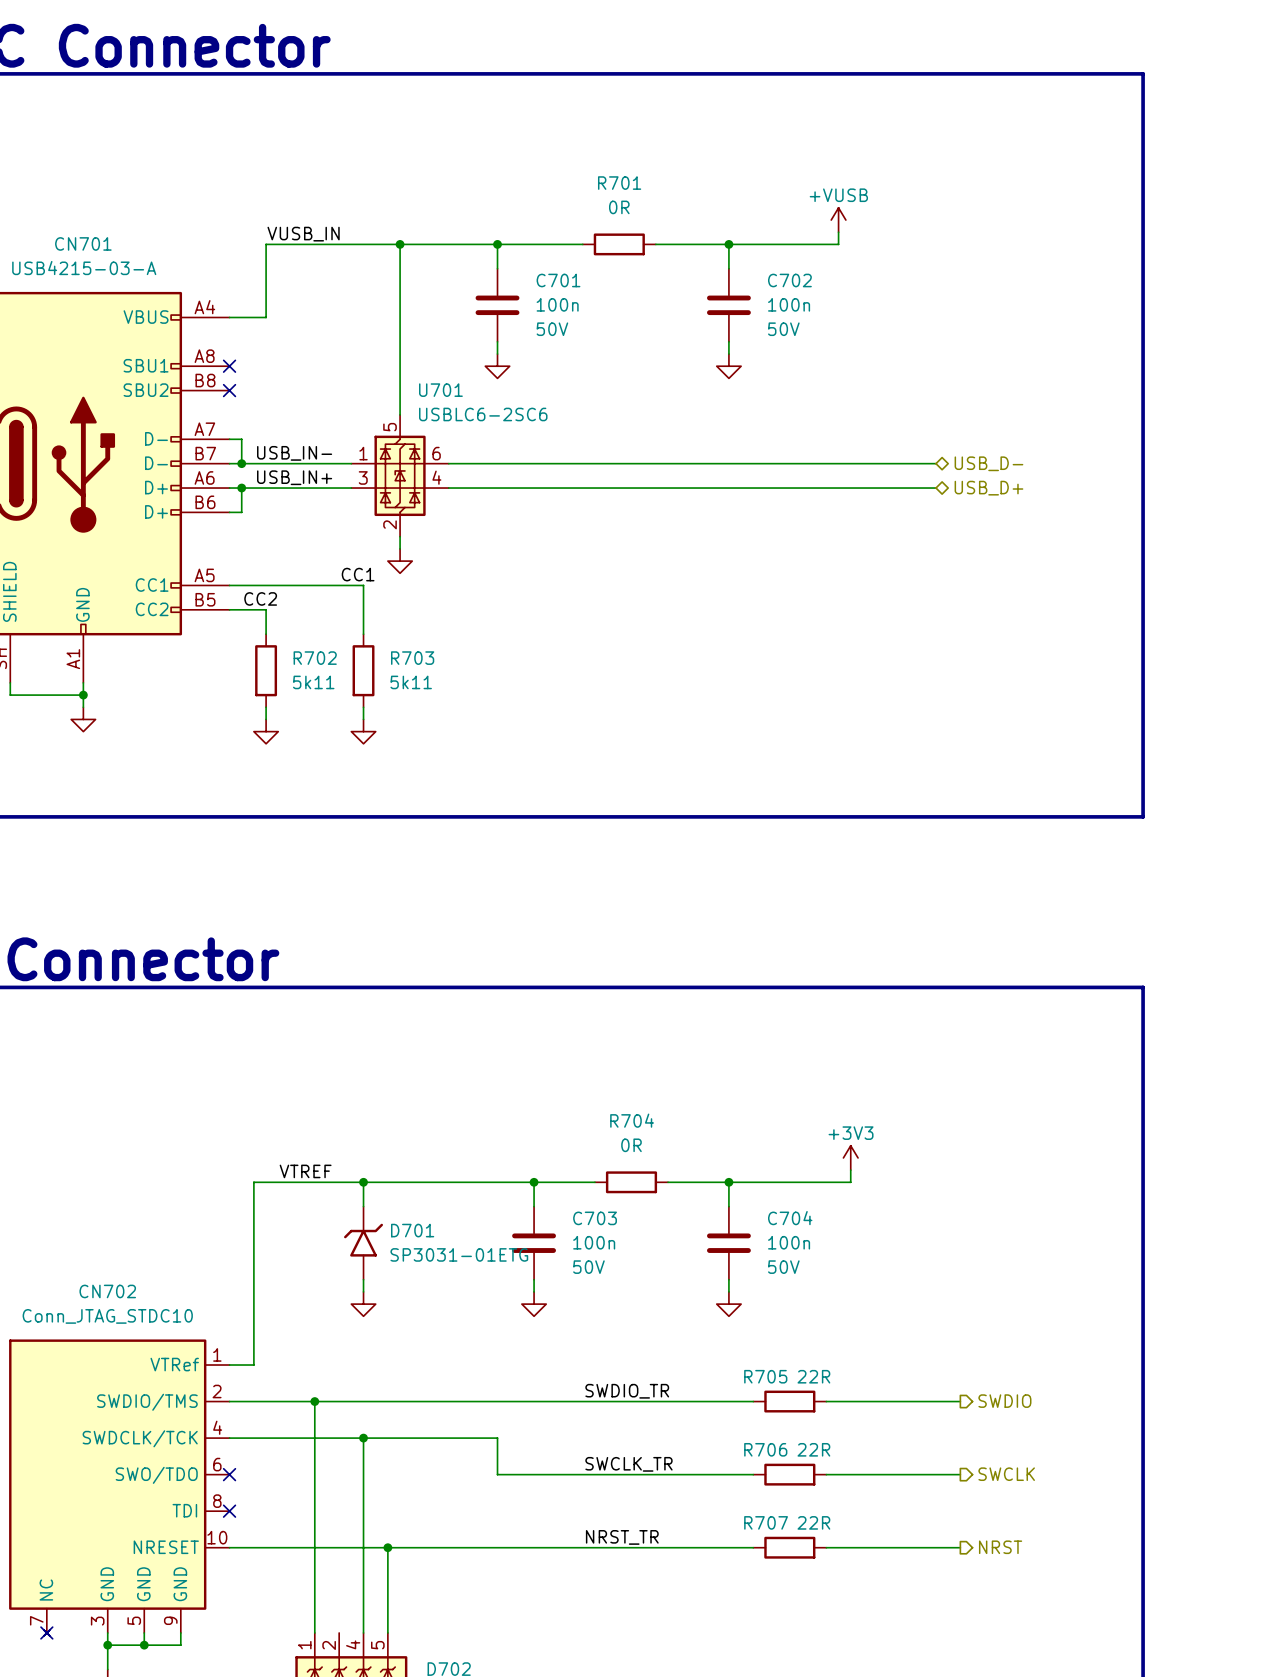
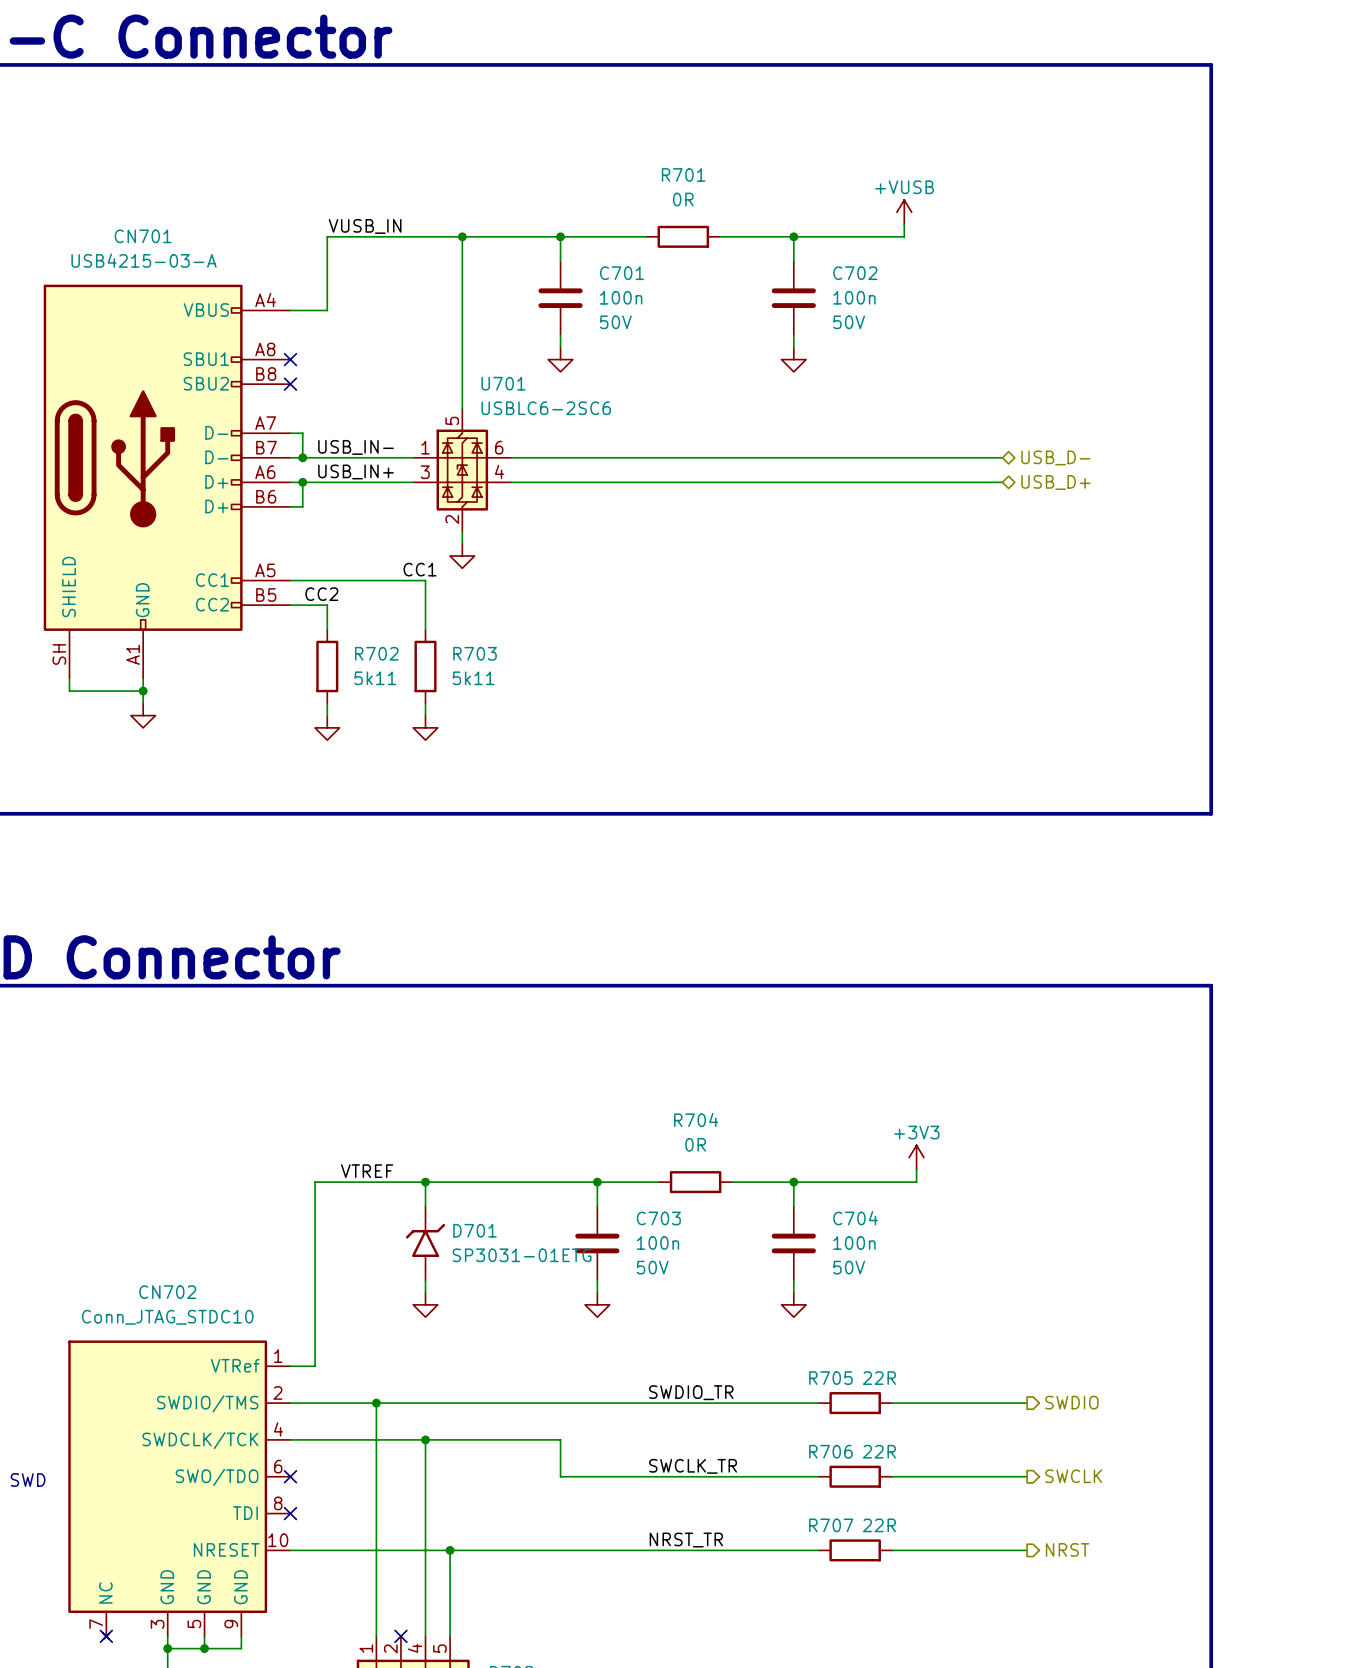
no-connect mark: none -> (400, 1636)

